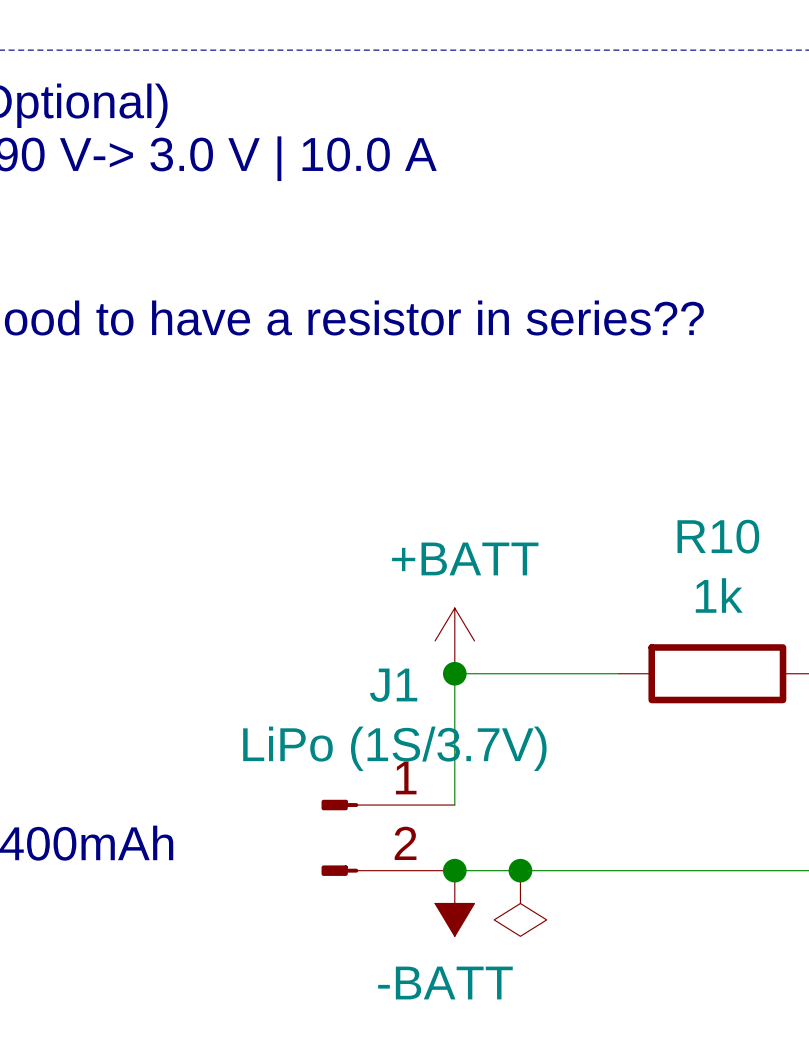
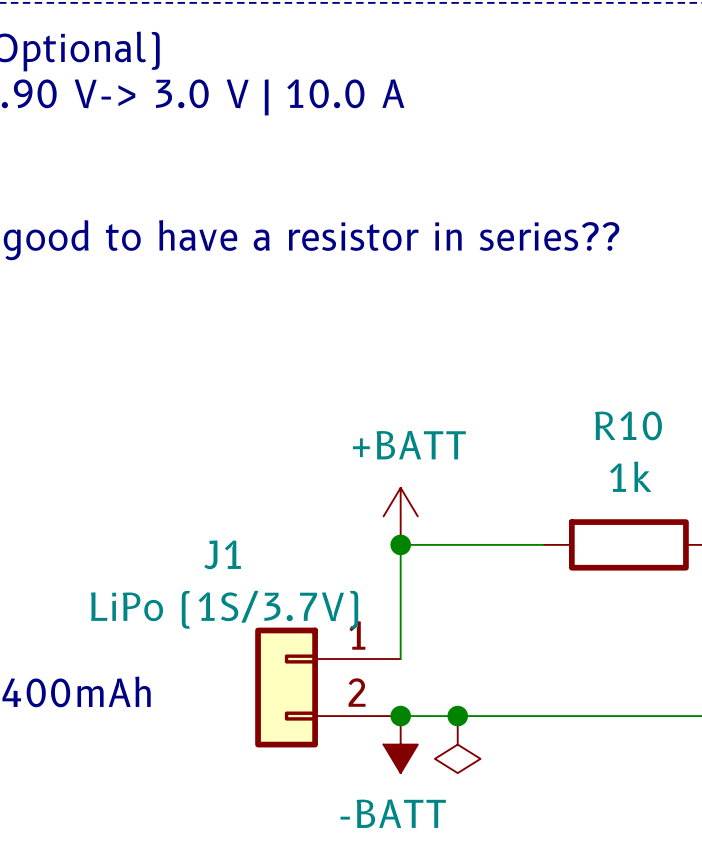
J1 name position: J1 (393, 685) -> J1 (222, 554)
J1 value position: LiPo (1S/3.7V) (394, 748) -> LiPo (1S/3.7V) (224, 609)
J1 symbol: [321, 799, 455, 876] -> [255, 627, 401, 748]

